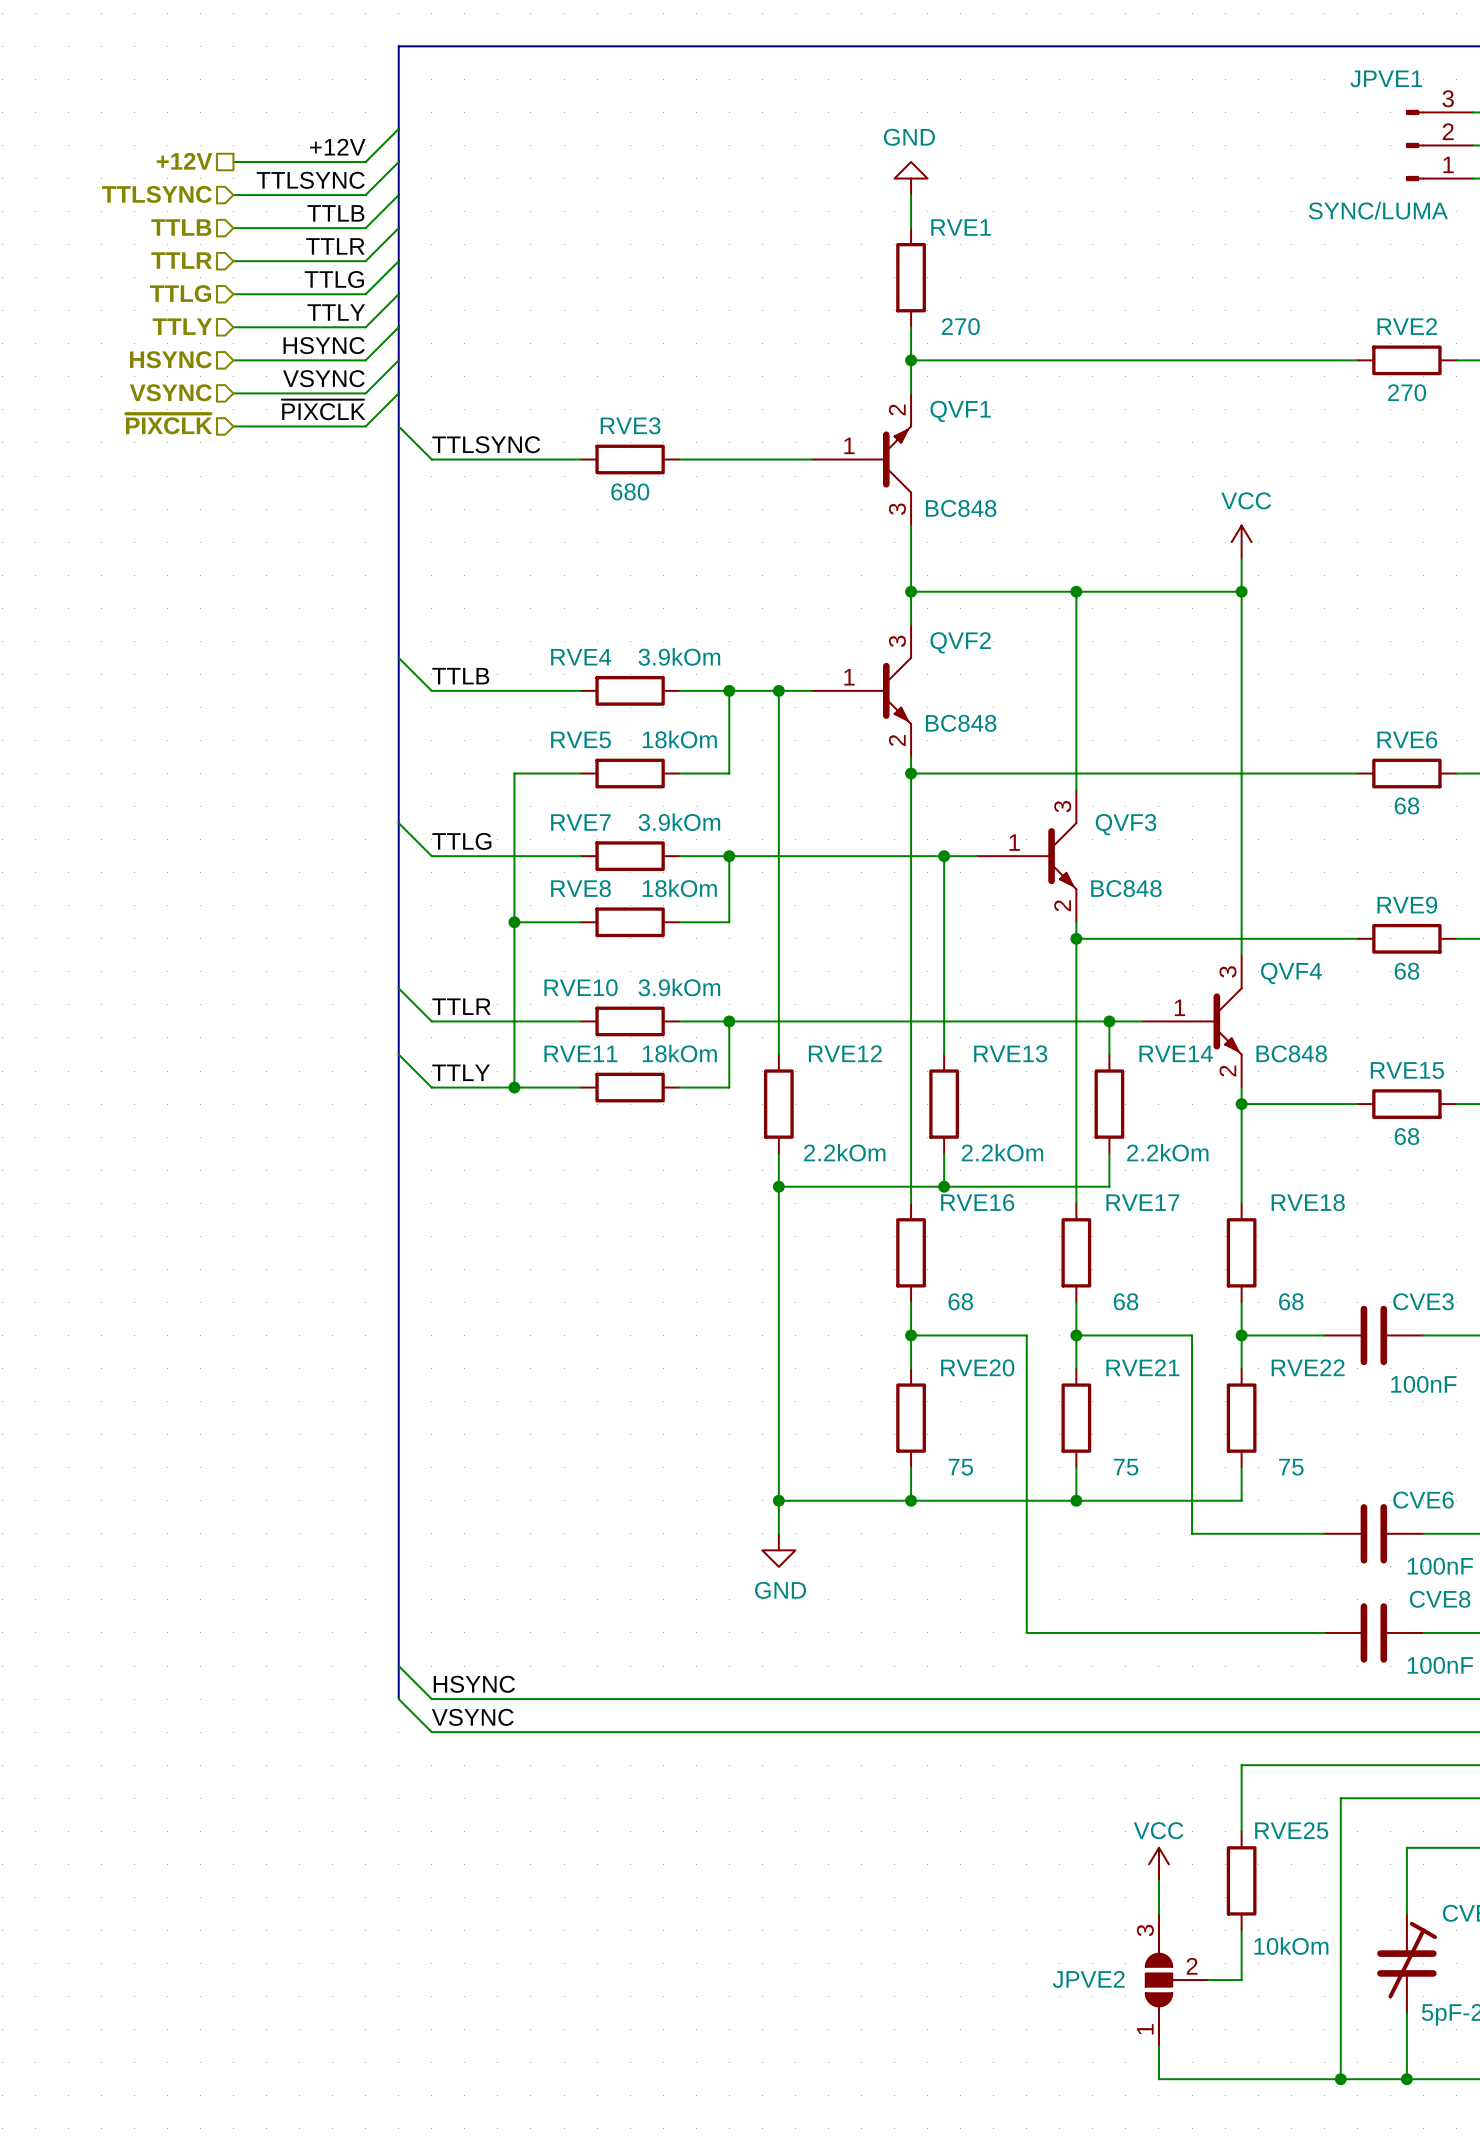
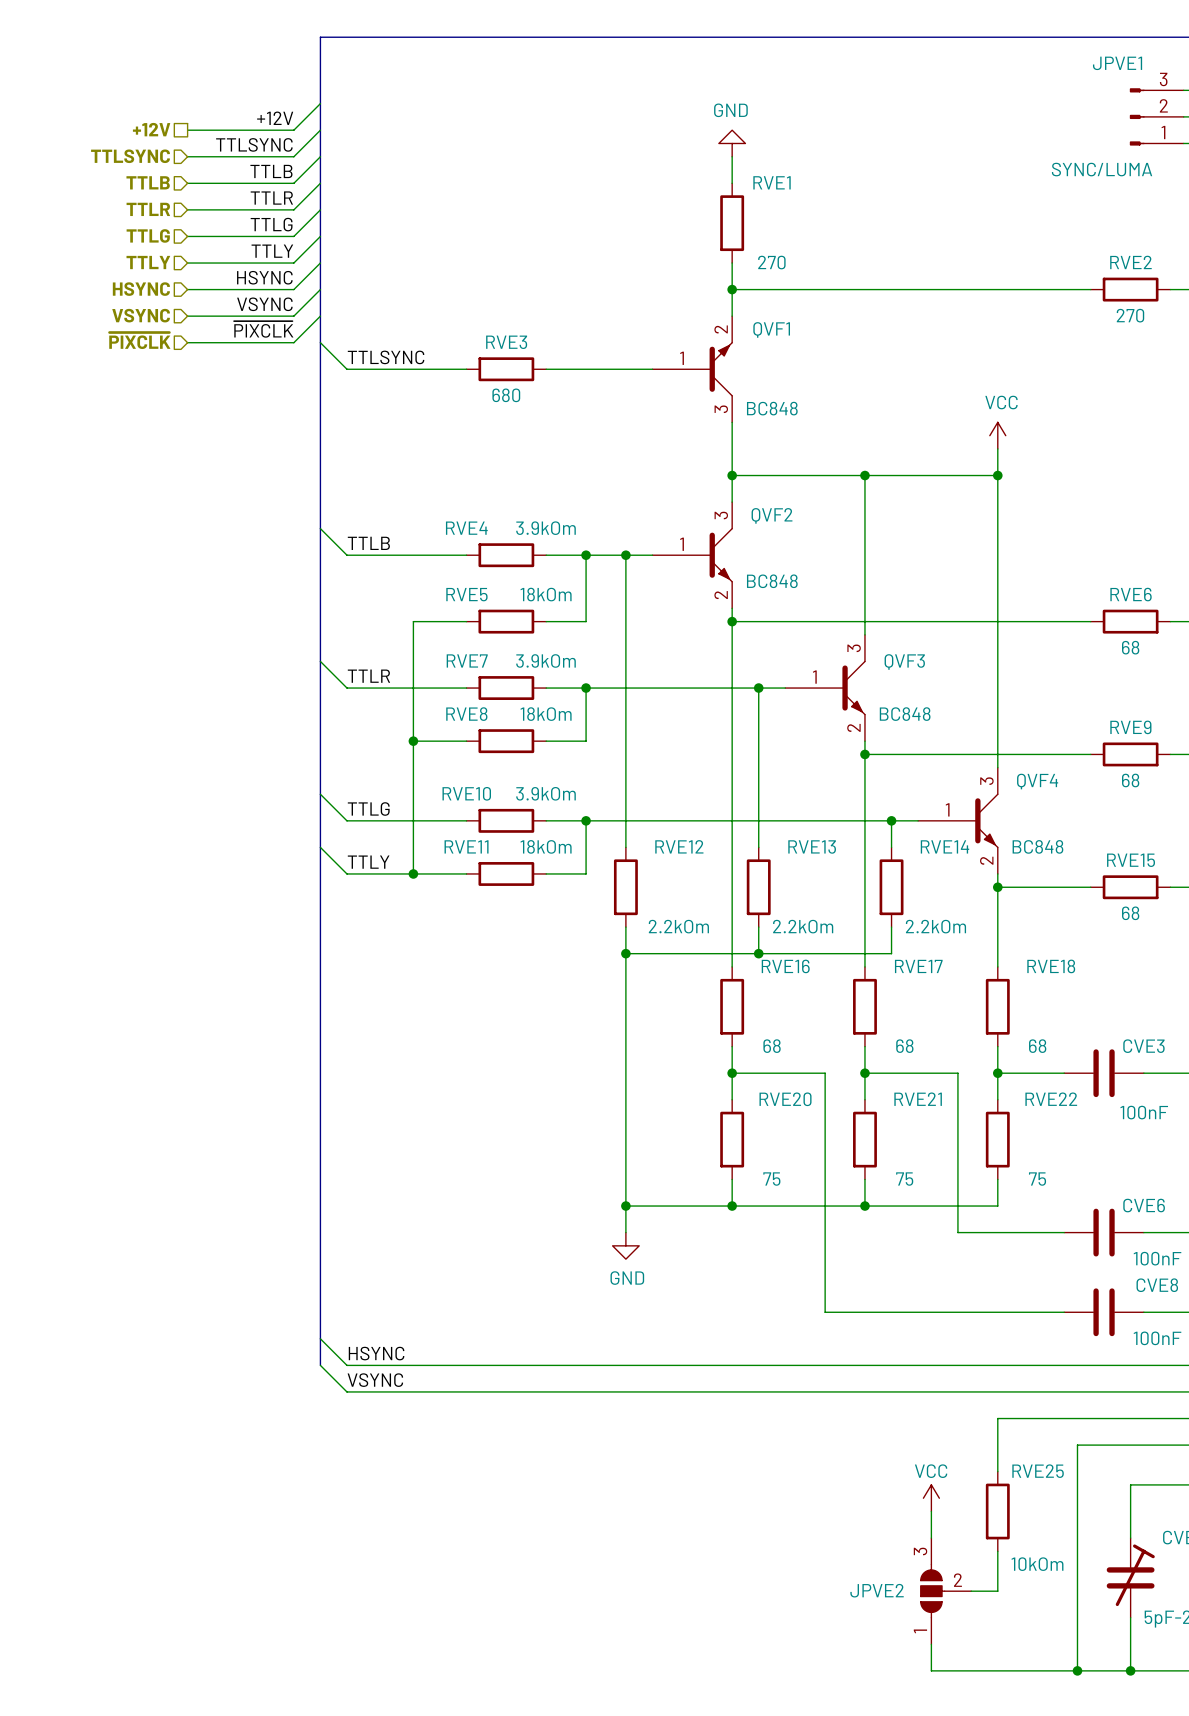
label: TTLG (461, 841) -> TTLR (368, 676)
label: TTLR (461, 1006) -> TTLG (368, 808)

